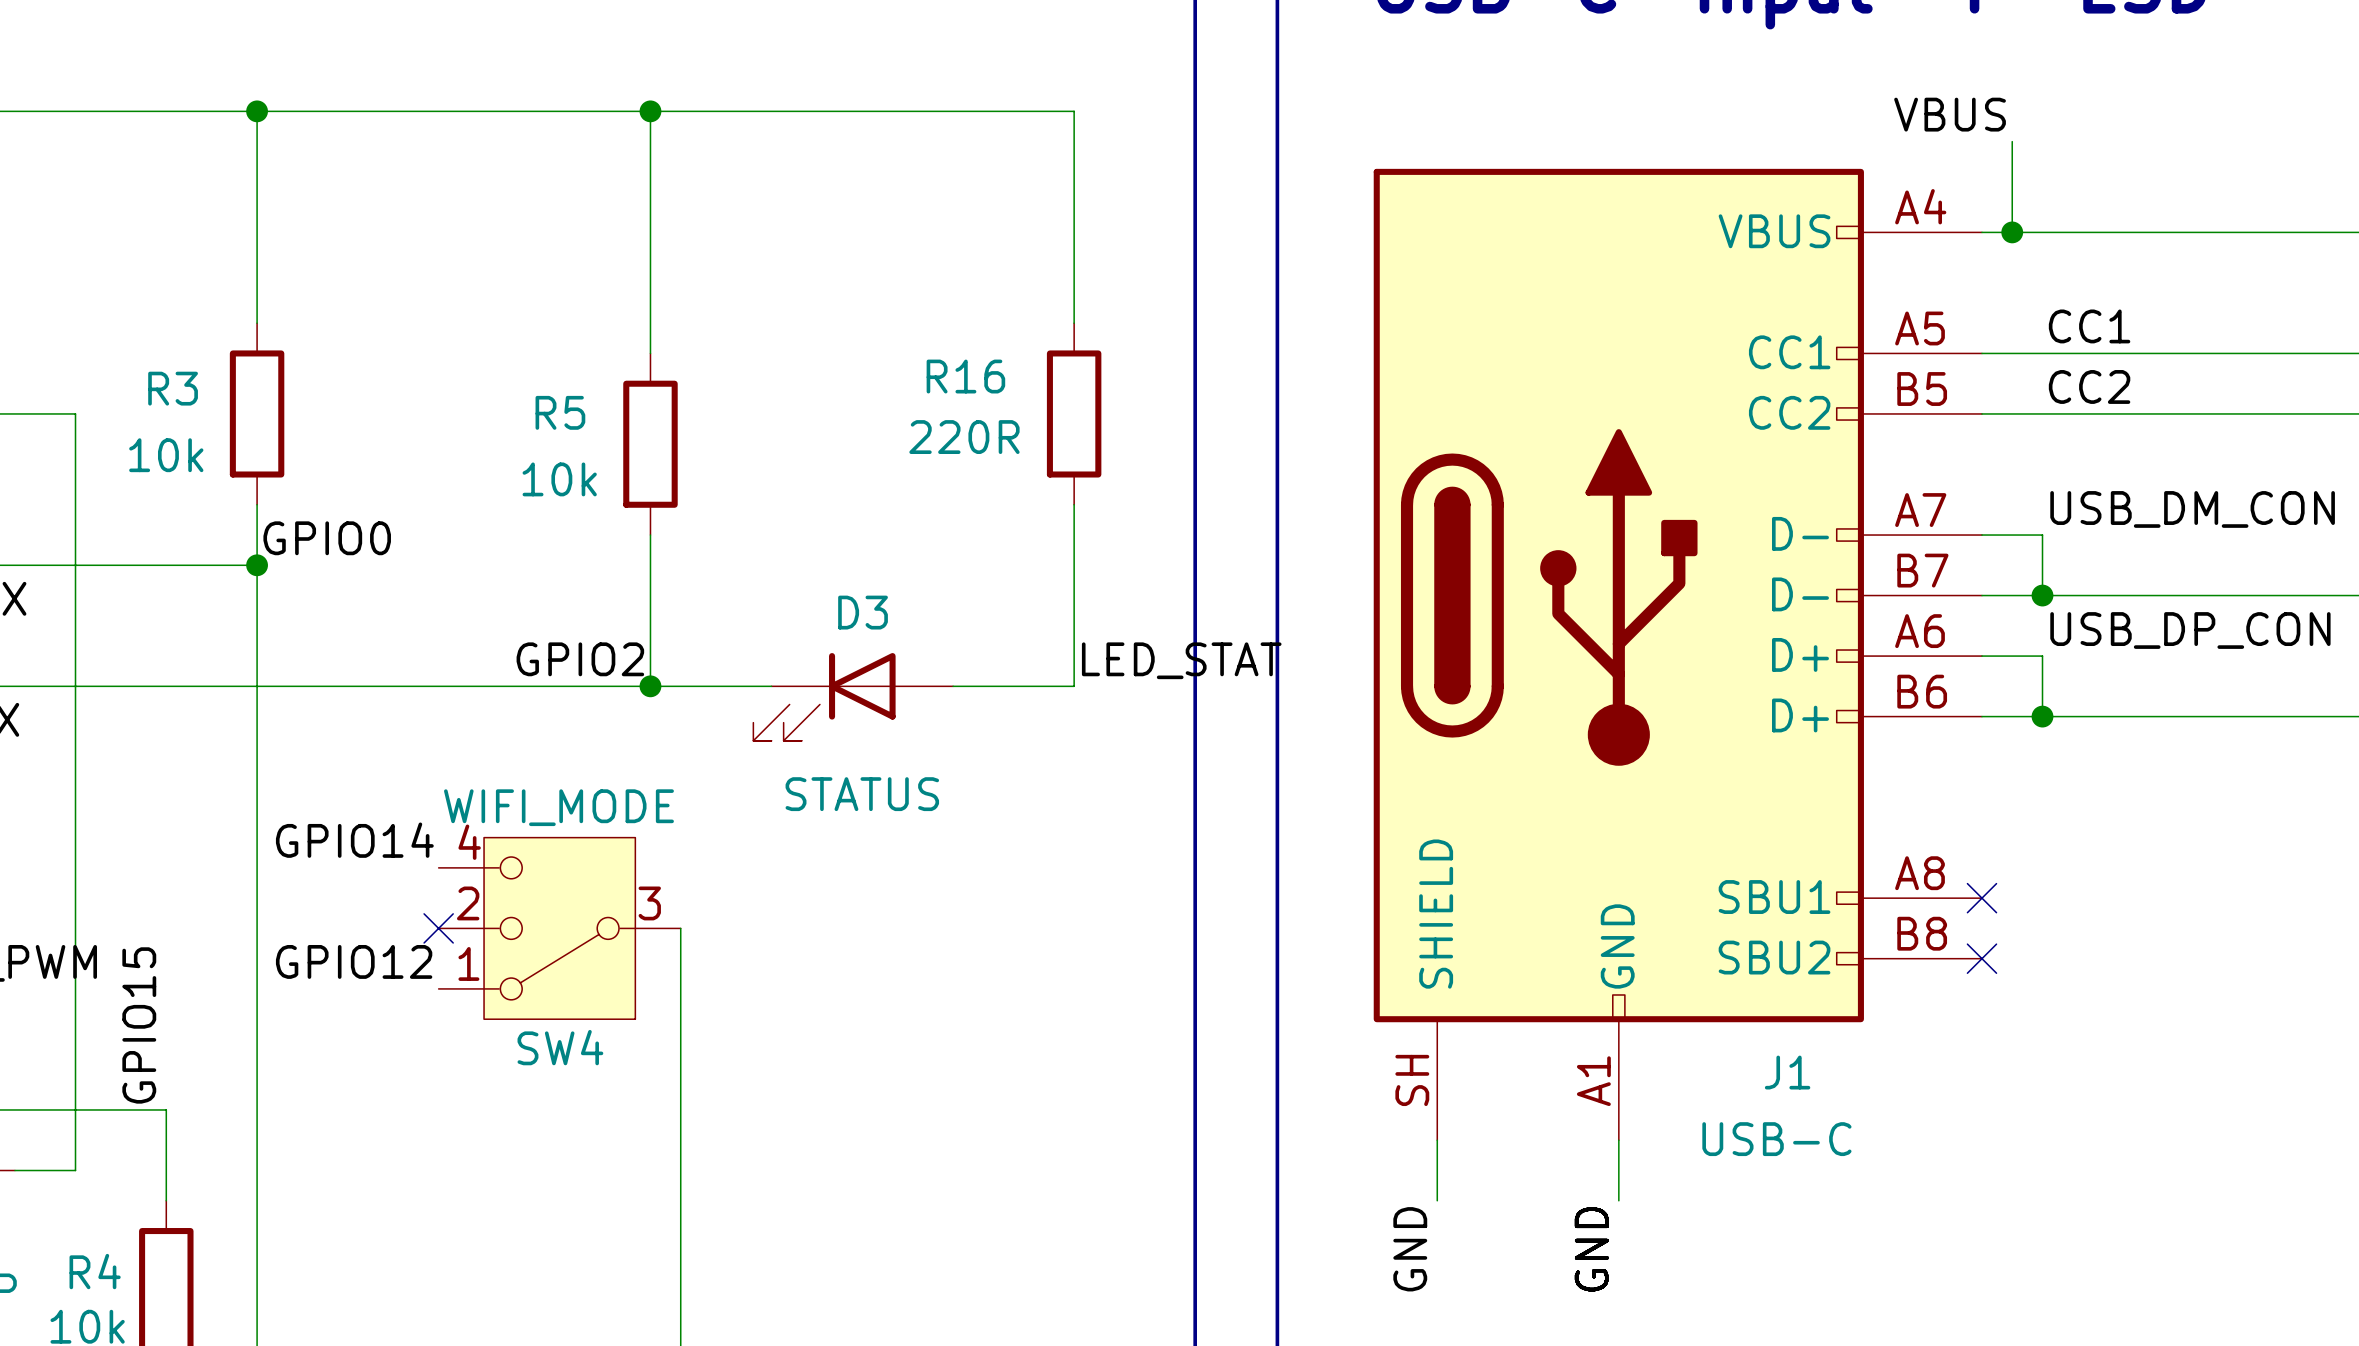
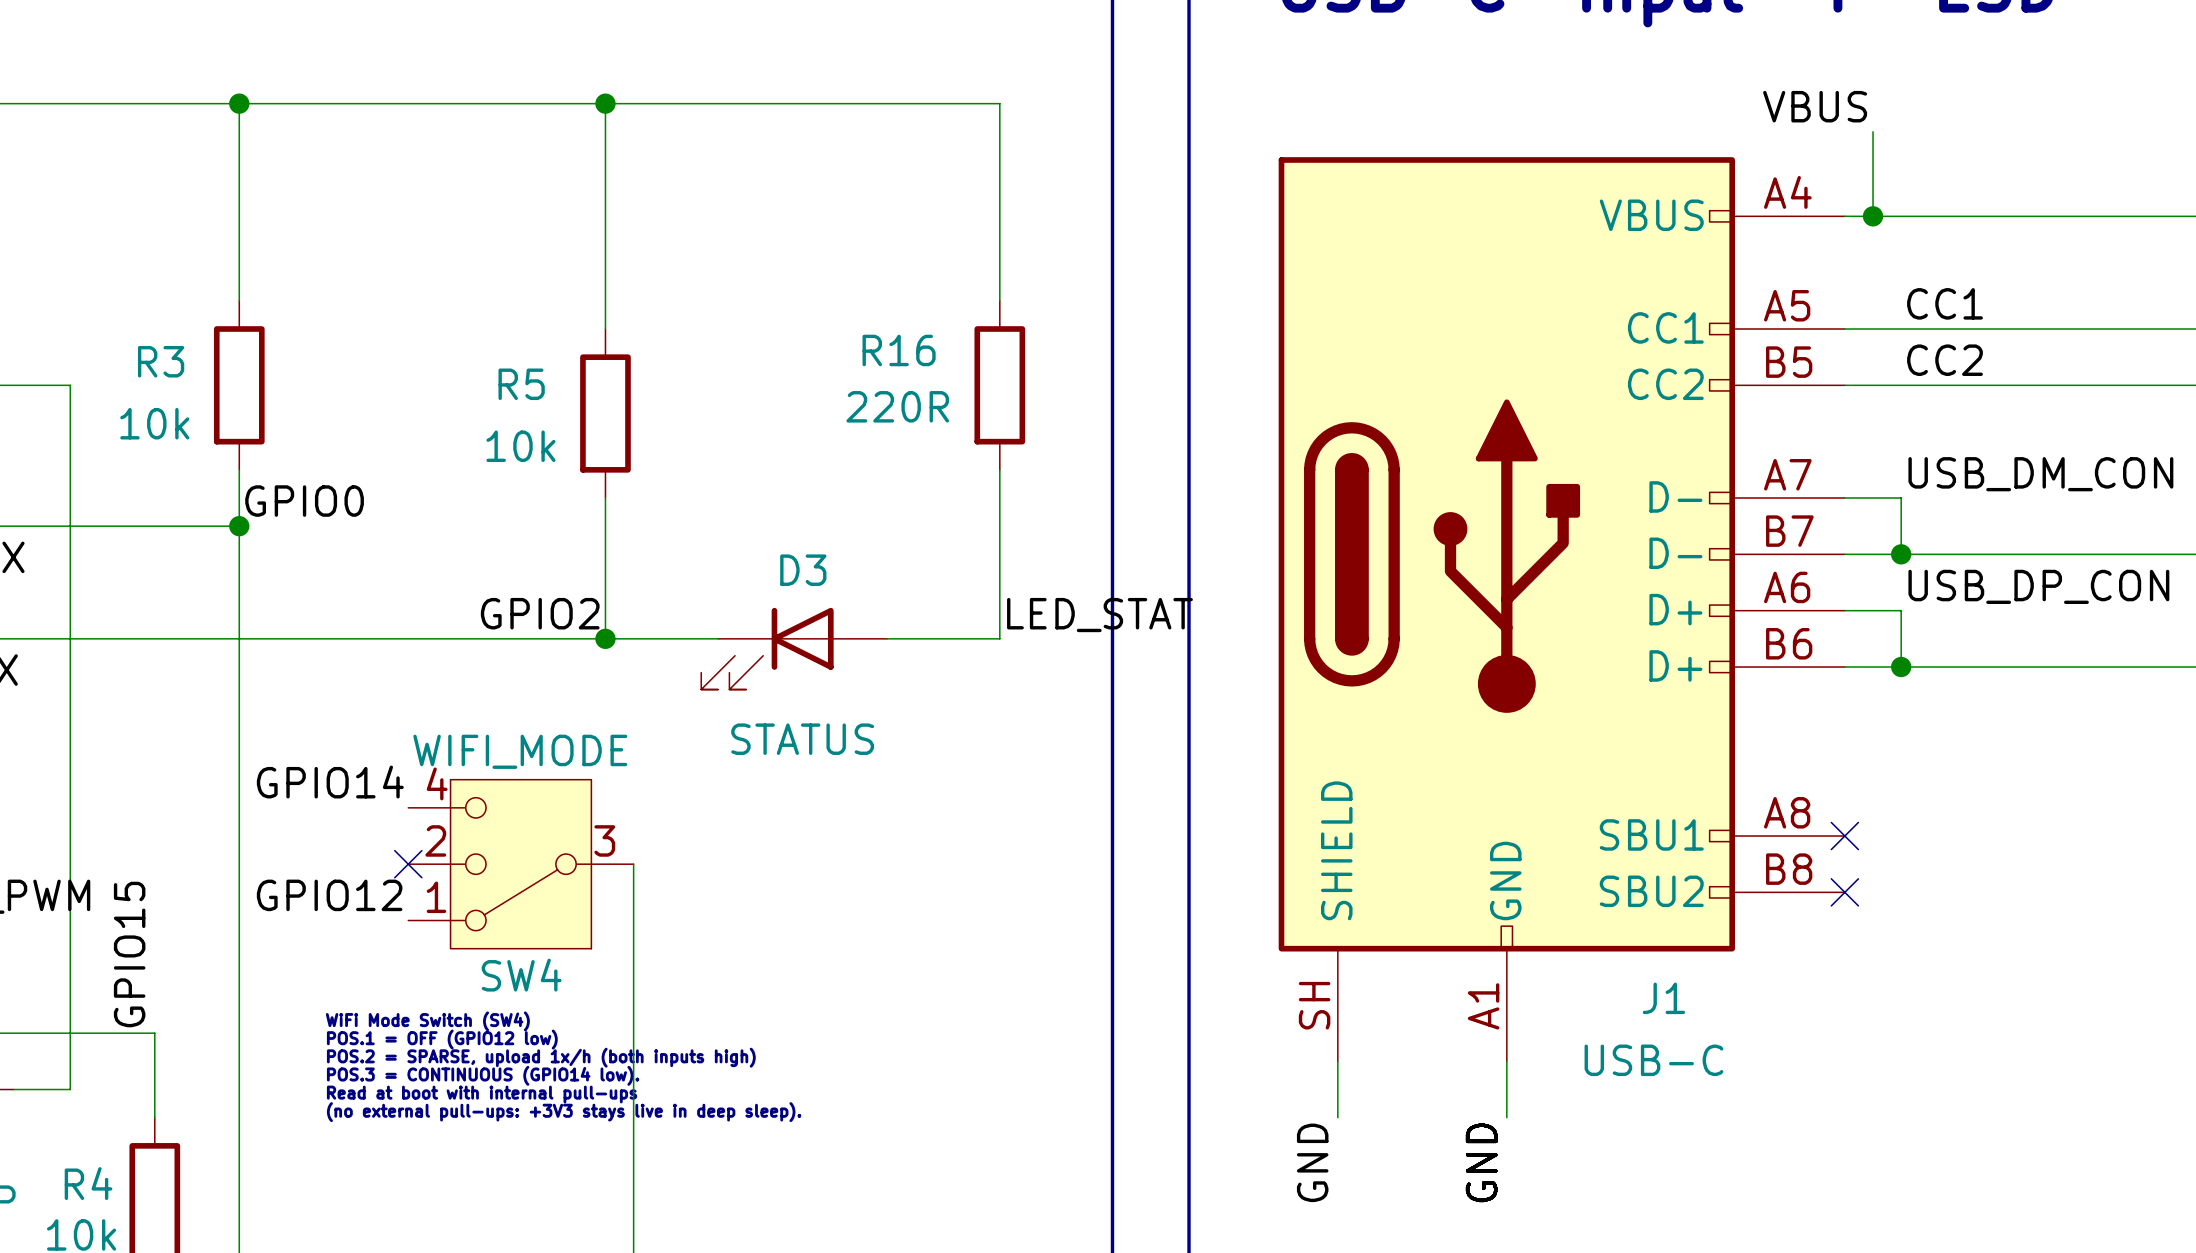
text: none -> WiFi Mode Switch (SW4) (427, 1021)
text: none -> POS.1 = OFF (GPIO12 low) (442, 1039)
text: none -> POS.2 = SPARSE, upload 1x/h (both inputs high) (541, 1057)
text: none -> POS.3 = CONTINUOUS (GPIO14 low). (483, 1075)
text: none -> Read at boot with internal pull-ups (482, 1094)
text: none -> (no external pull-ups: +3V3 stays live in deep sleep). (564, 1112)

